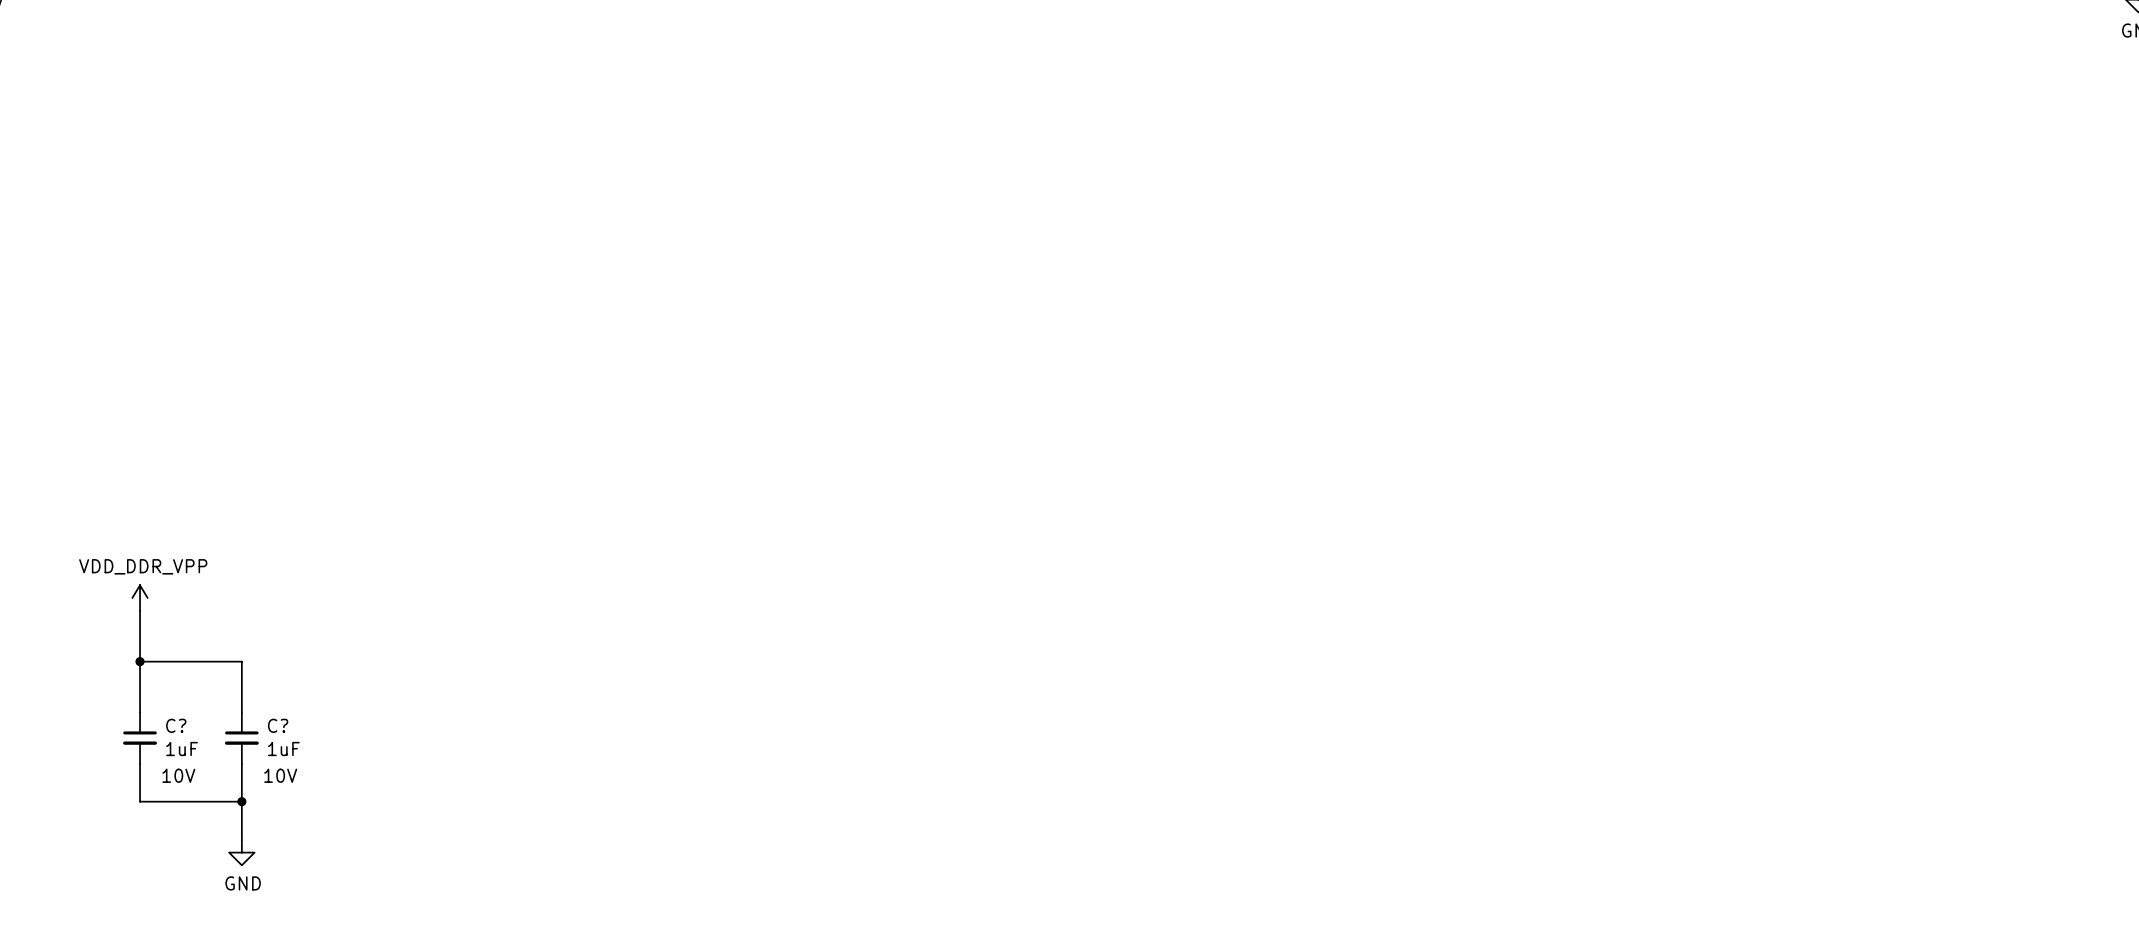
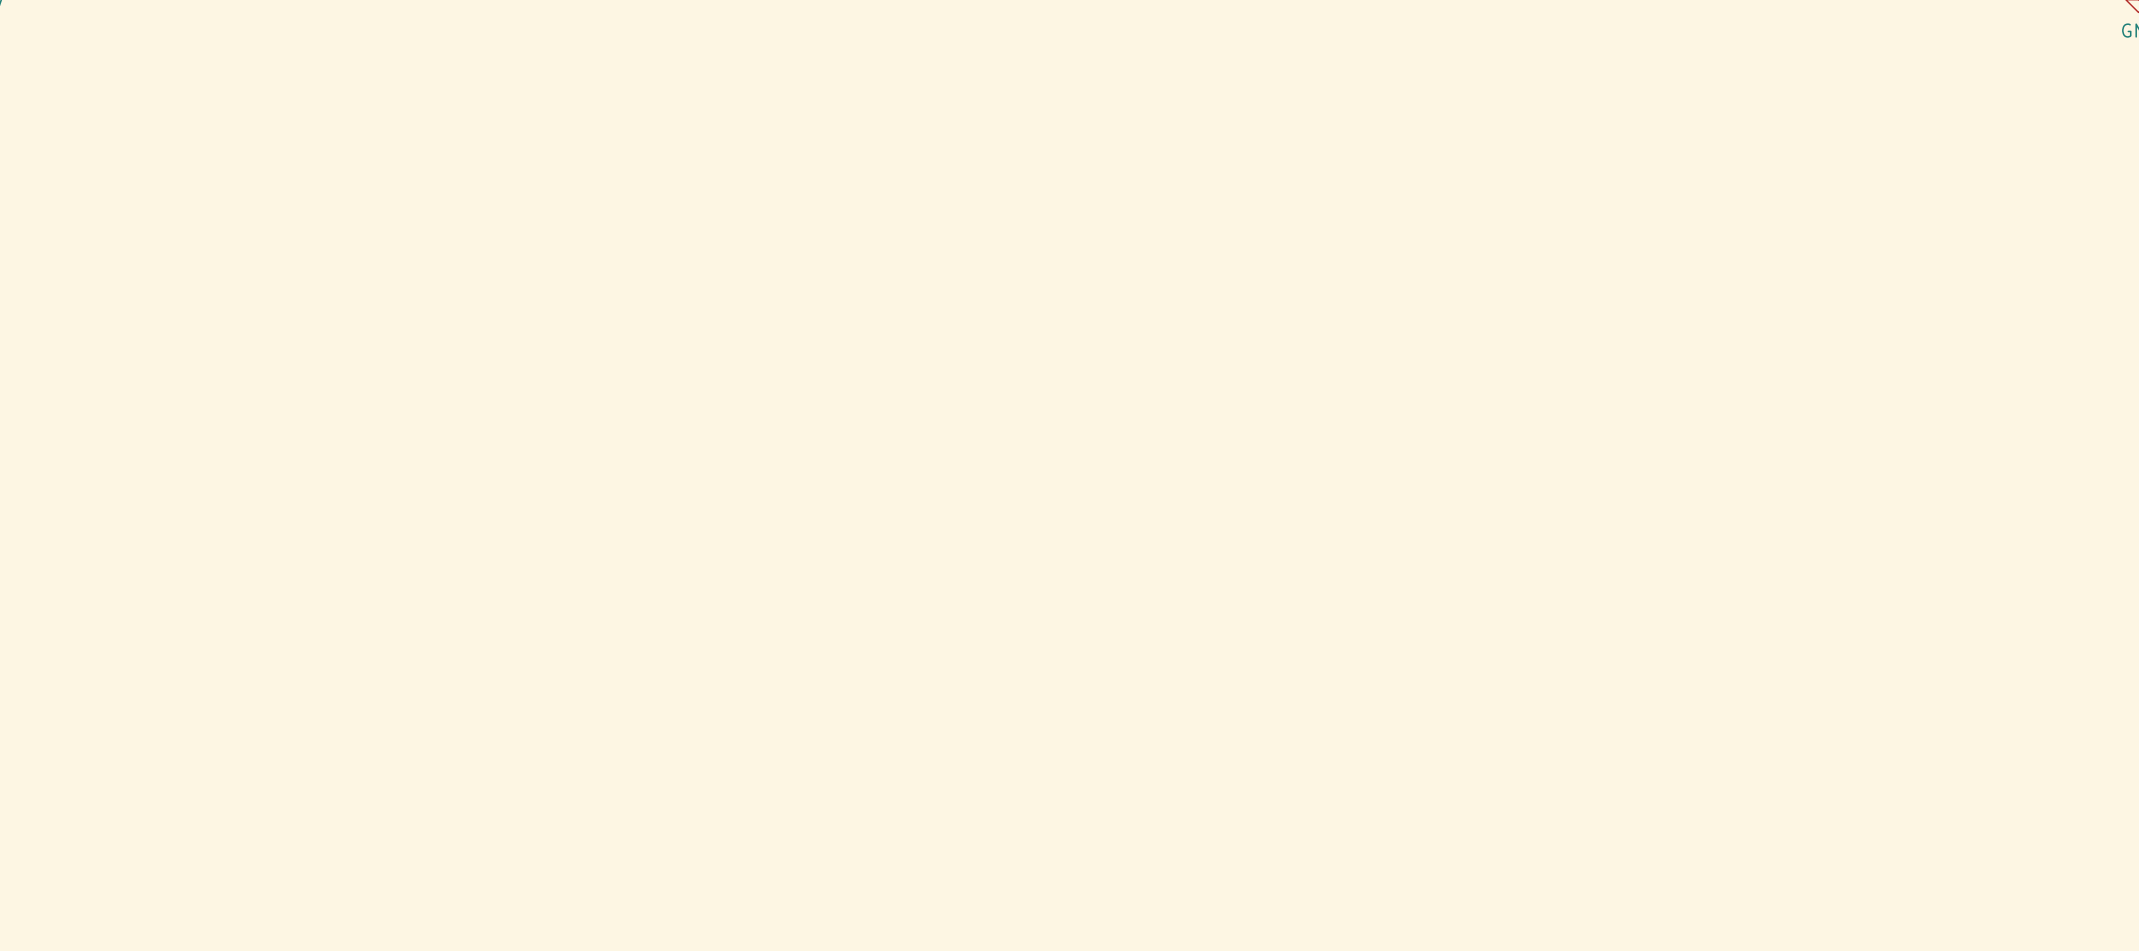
power symbol: VDD_DDR_VPP (140, 598) -> none
wire: (140, 610) (140, 712) -> none
wire: (140, 661) (241, 661) (241, 712) -> none
junction: (140, 661) -> none
C?: 1uF (140, 738) -> none
C?: 1uF (241, 738) -> none
wire: (140, 763) (140, 801) (241, 801) -> none
wire: (241, 763) (241, 839) -> none
junction: (241, 801) -> none
power symbol: GND (241, 852) -> none

